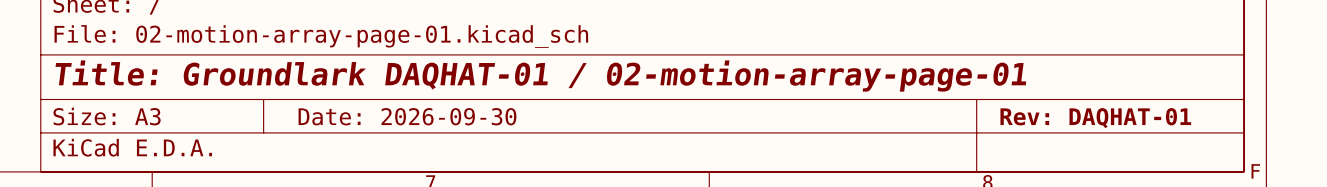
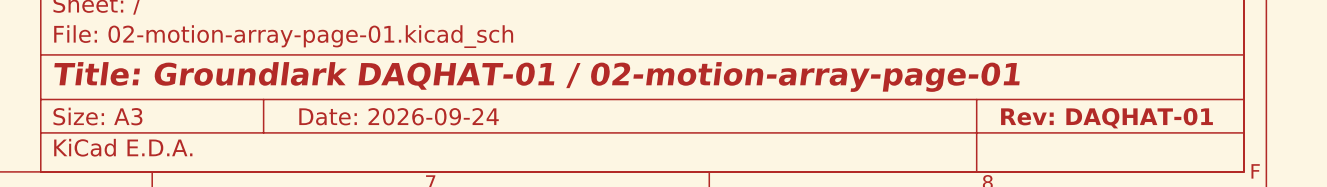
title block: Date: 2026-09-30 (407, 116) -> Date: 2026-09-24 (399, 116)

